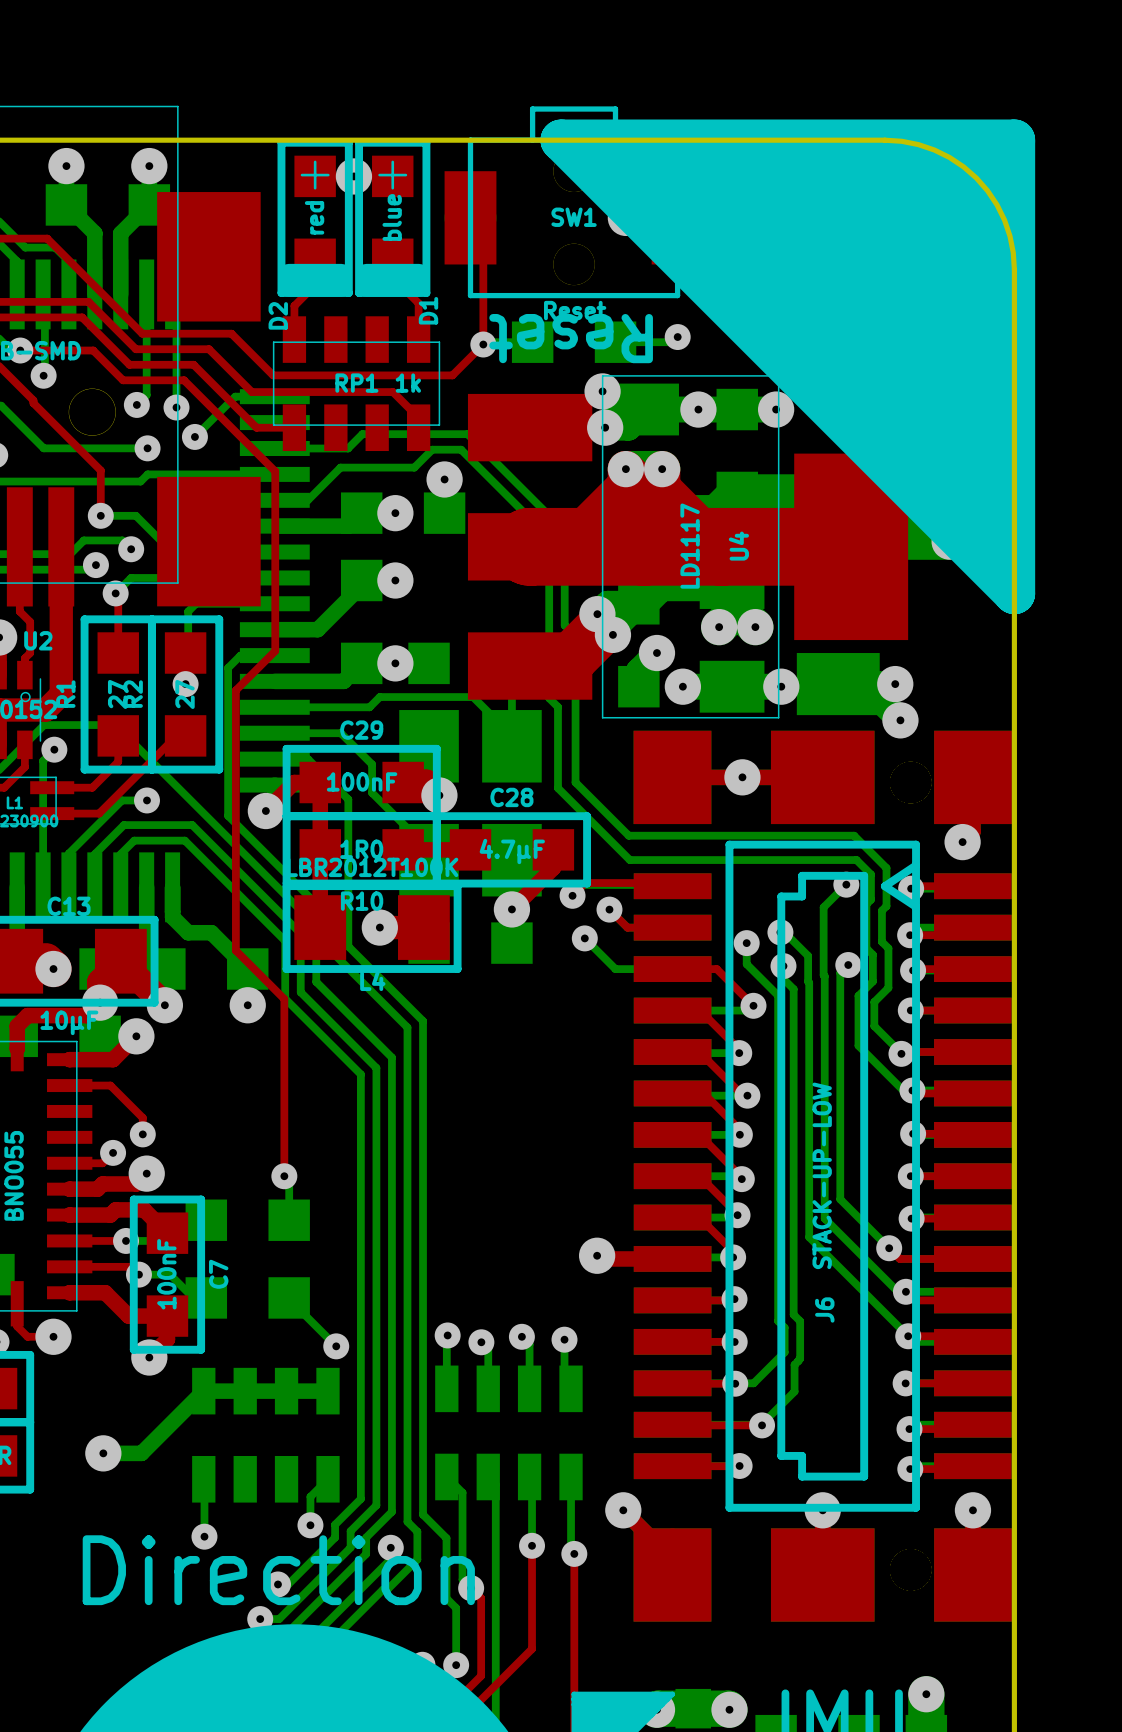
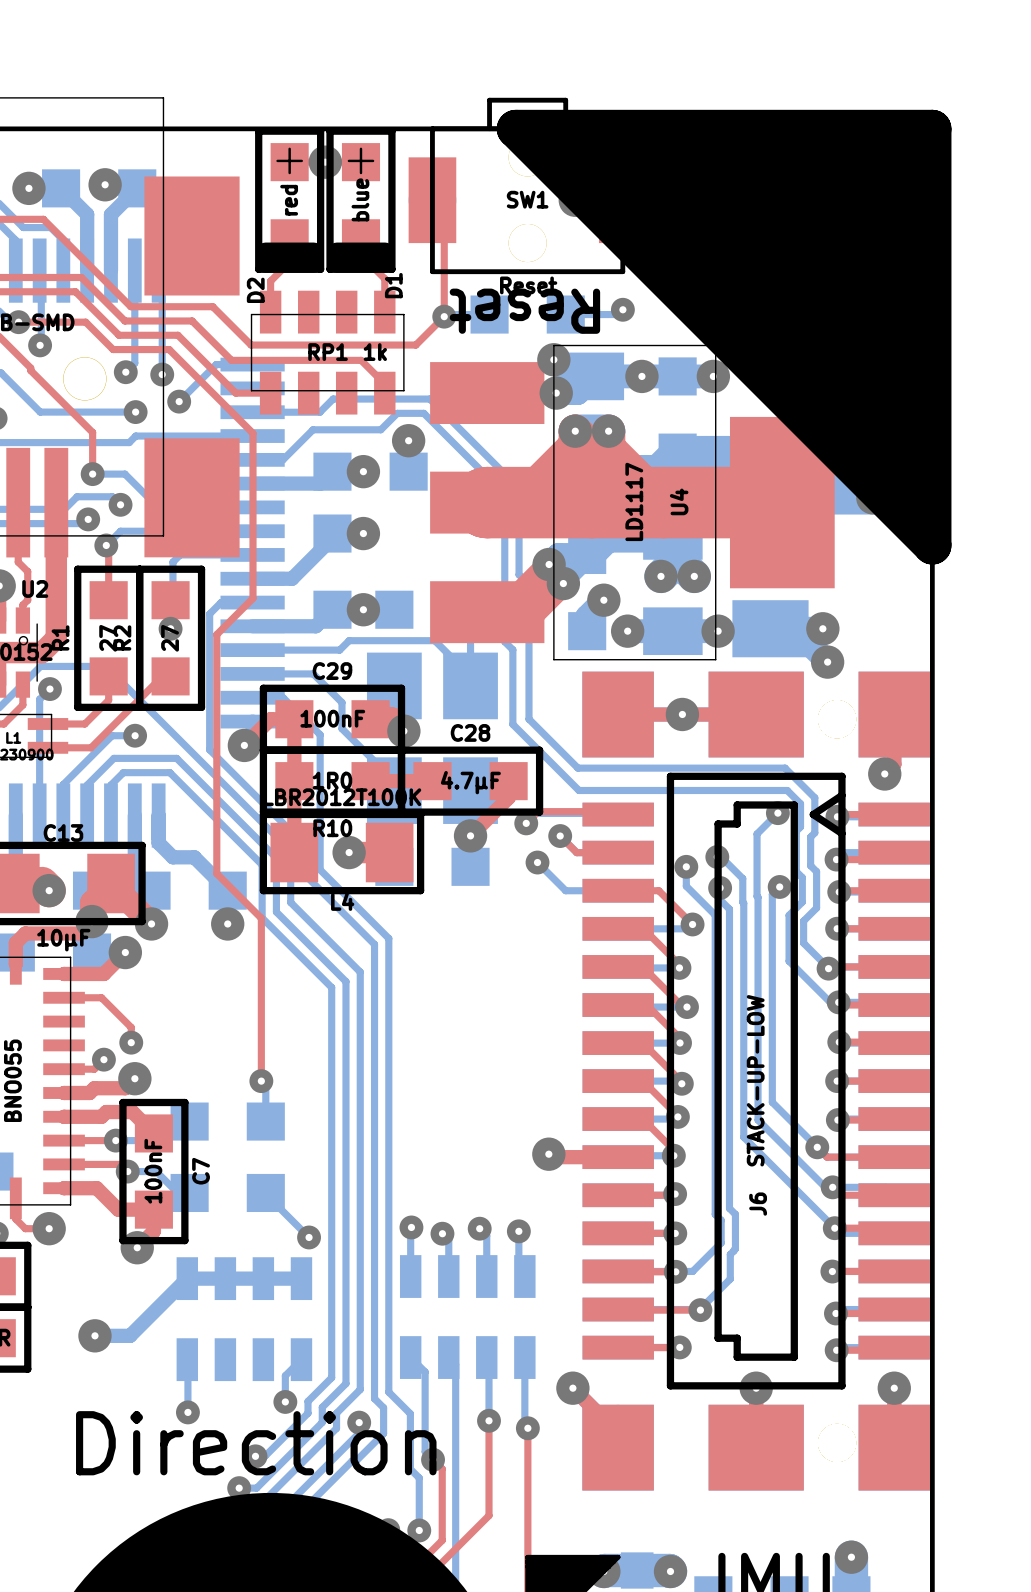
via: (66, 166) -> none
via position: (149, 166) -> (105, 184)
via: none -> (28, 188)

